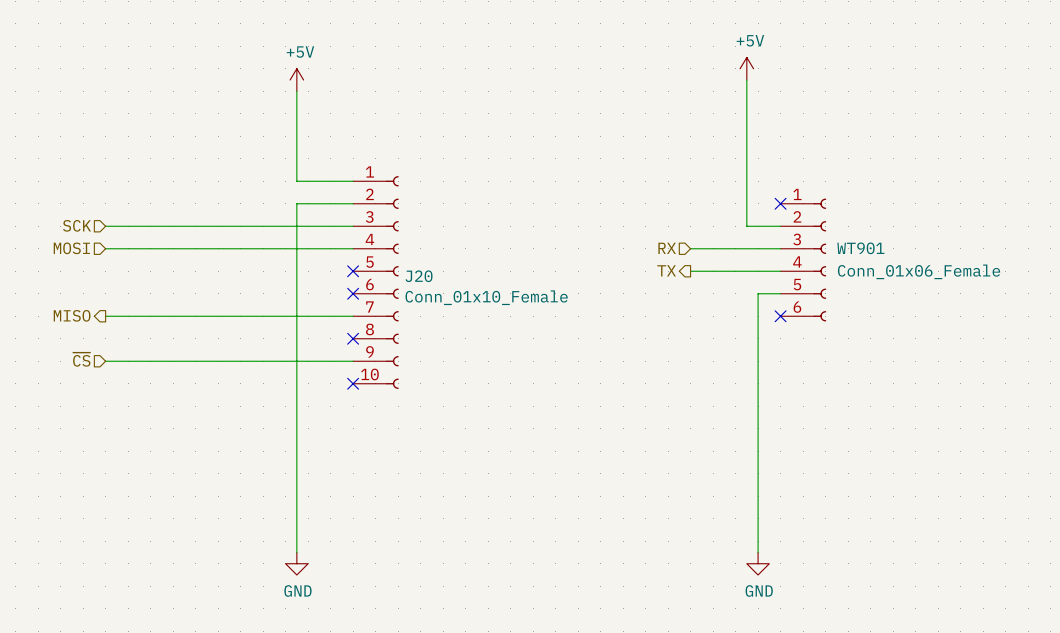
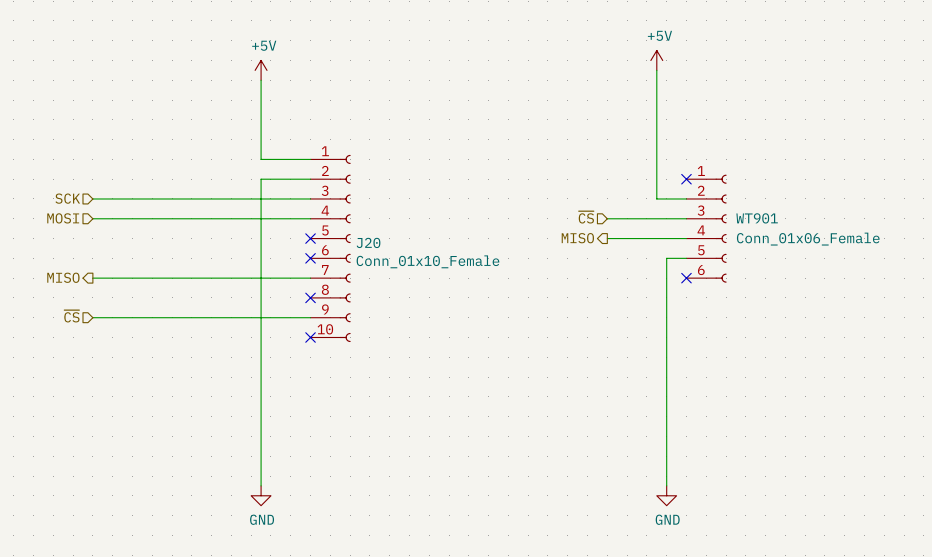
hierarchical label: RX (667, 248) -> ~{CS} (586, 217)
hierarchical label: TX (666, 270) -> MISO (577, 238)

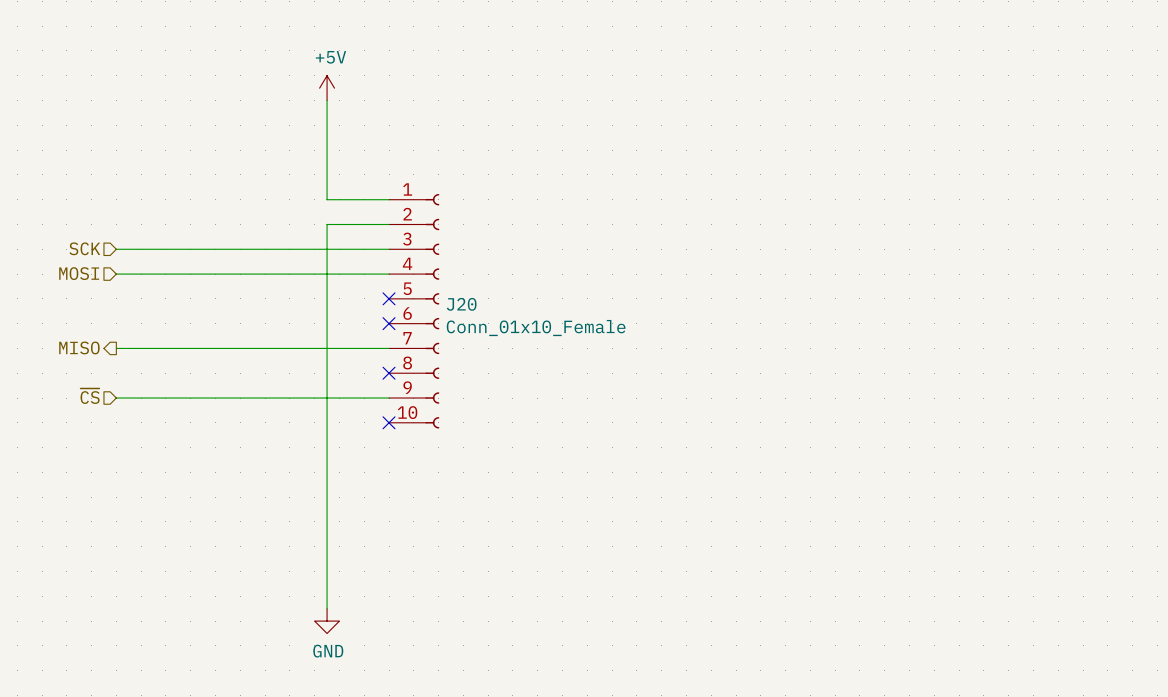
power symbol: +5V (656, 60) -> none
wire: (656, 70) (656, 198) (686, 198) -> none
no-connect mark: (686, 179) -> none
hierarchical label: ~{CS} (586, 217) -> none
wire: (607, 218) (686, 218) -> none
WT901: Conn_01x06_Female (706, 228) -> none
hierarchical label: MISO (577, 238) -> none
wire: (607, 238) (686, 238) -> none
wire: (686, 258) (666, 258) (666, 485) -> none
no-connect mark: (686, 278) -> none
power symbol: GND (666, 495) -> none

